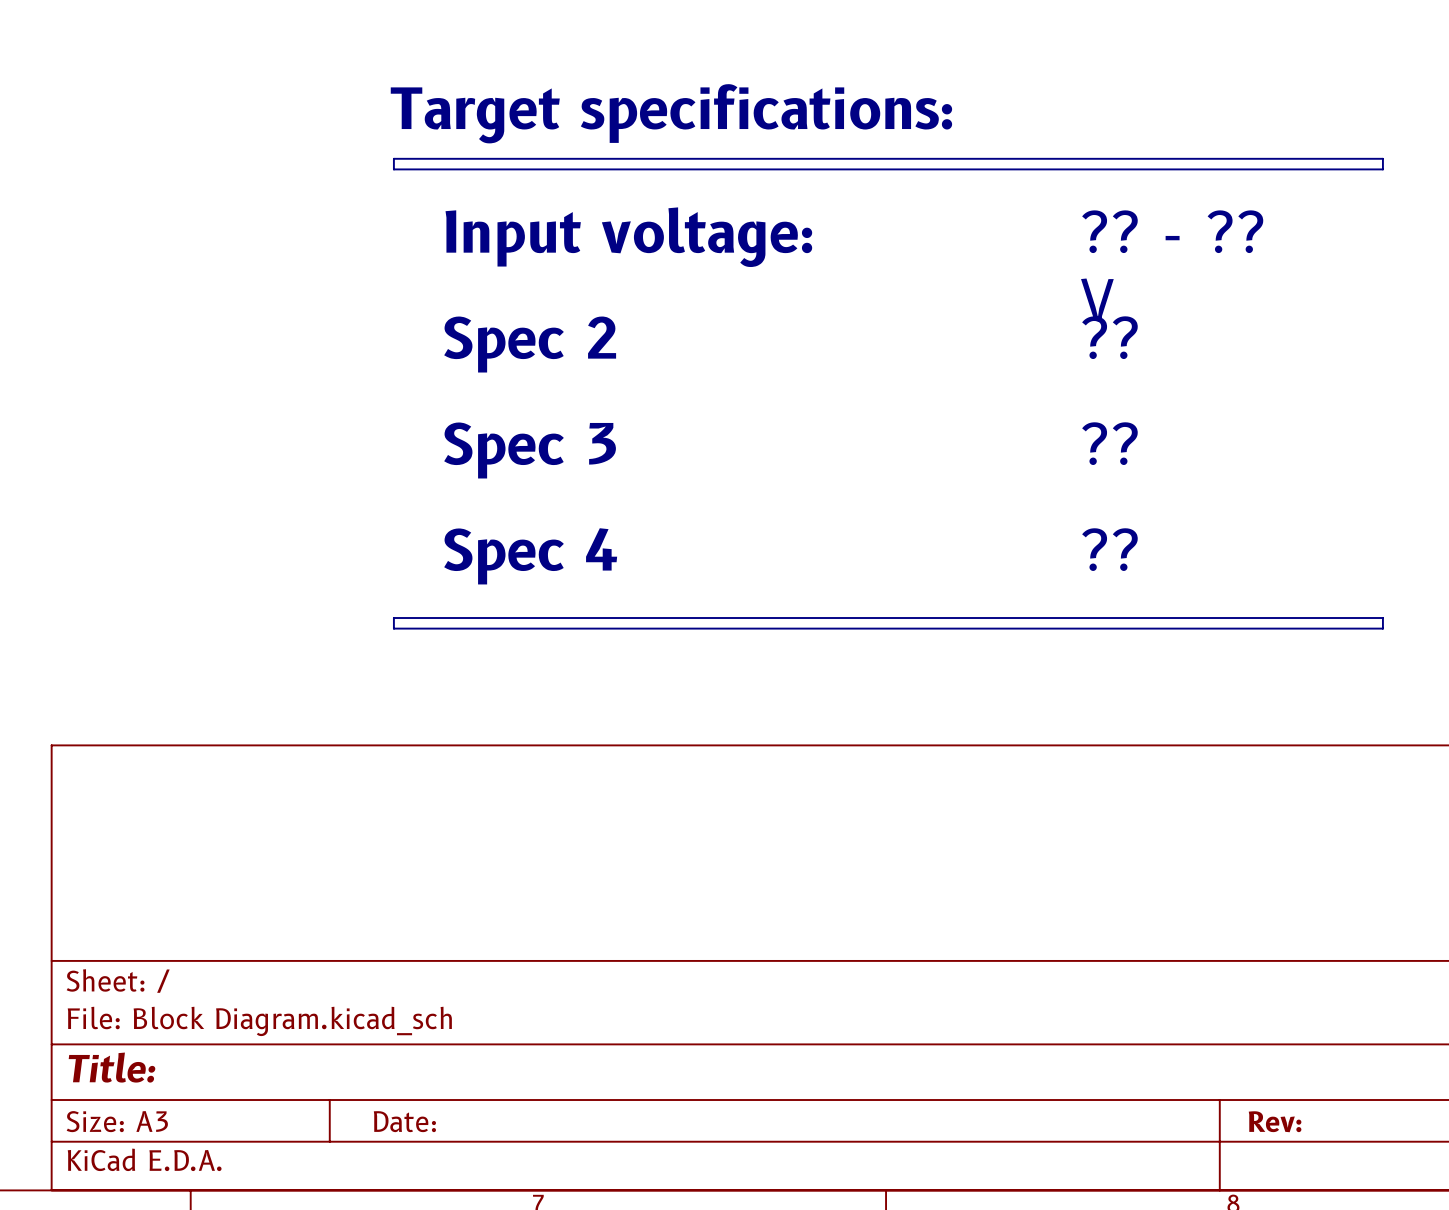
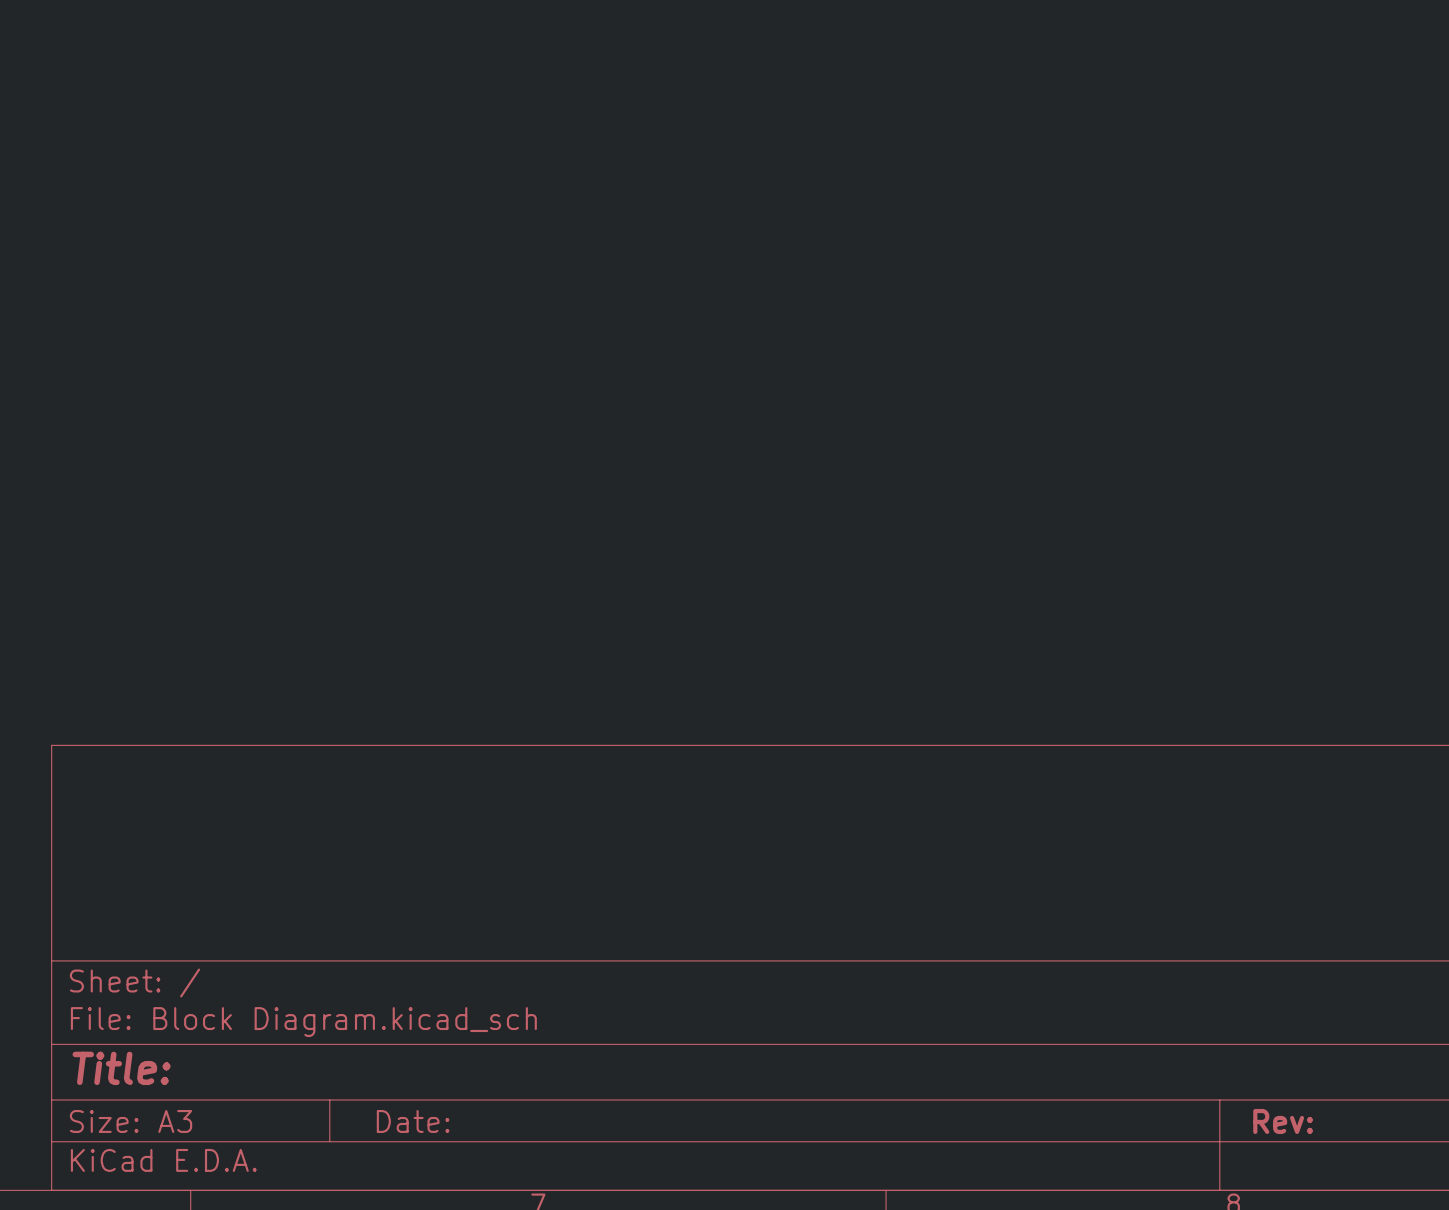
text: Target specifications: (671, 113) -> none
line: (393, 158) (393, 169) (1382, 169) (1382, 158) (393, 158) -> none
text: ?? - ?? (1172, 231) -> none
text: Input voltage: (628, 237) -> none
text: V (1097, 299) -> none
text: ?? (1109, 337) -> none
text: Spec 2 (530, 344) -> none
text: ?? (1109, 443) -> none
text: Spec 3 (530, 450) -> none
text: ?? (1109, 549) -> none
text: Spec 4 (530, 556) -> none
line: (393, 618) (1382, 618) (1382, 628) (393, 628) (393, 618) -> none

